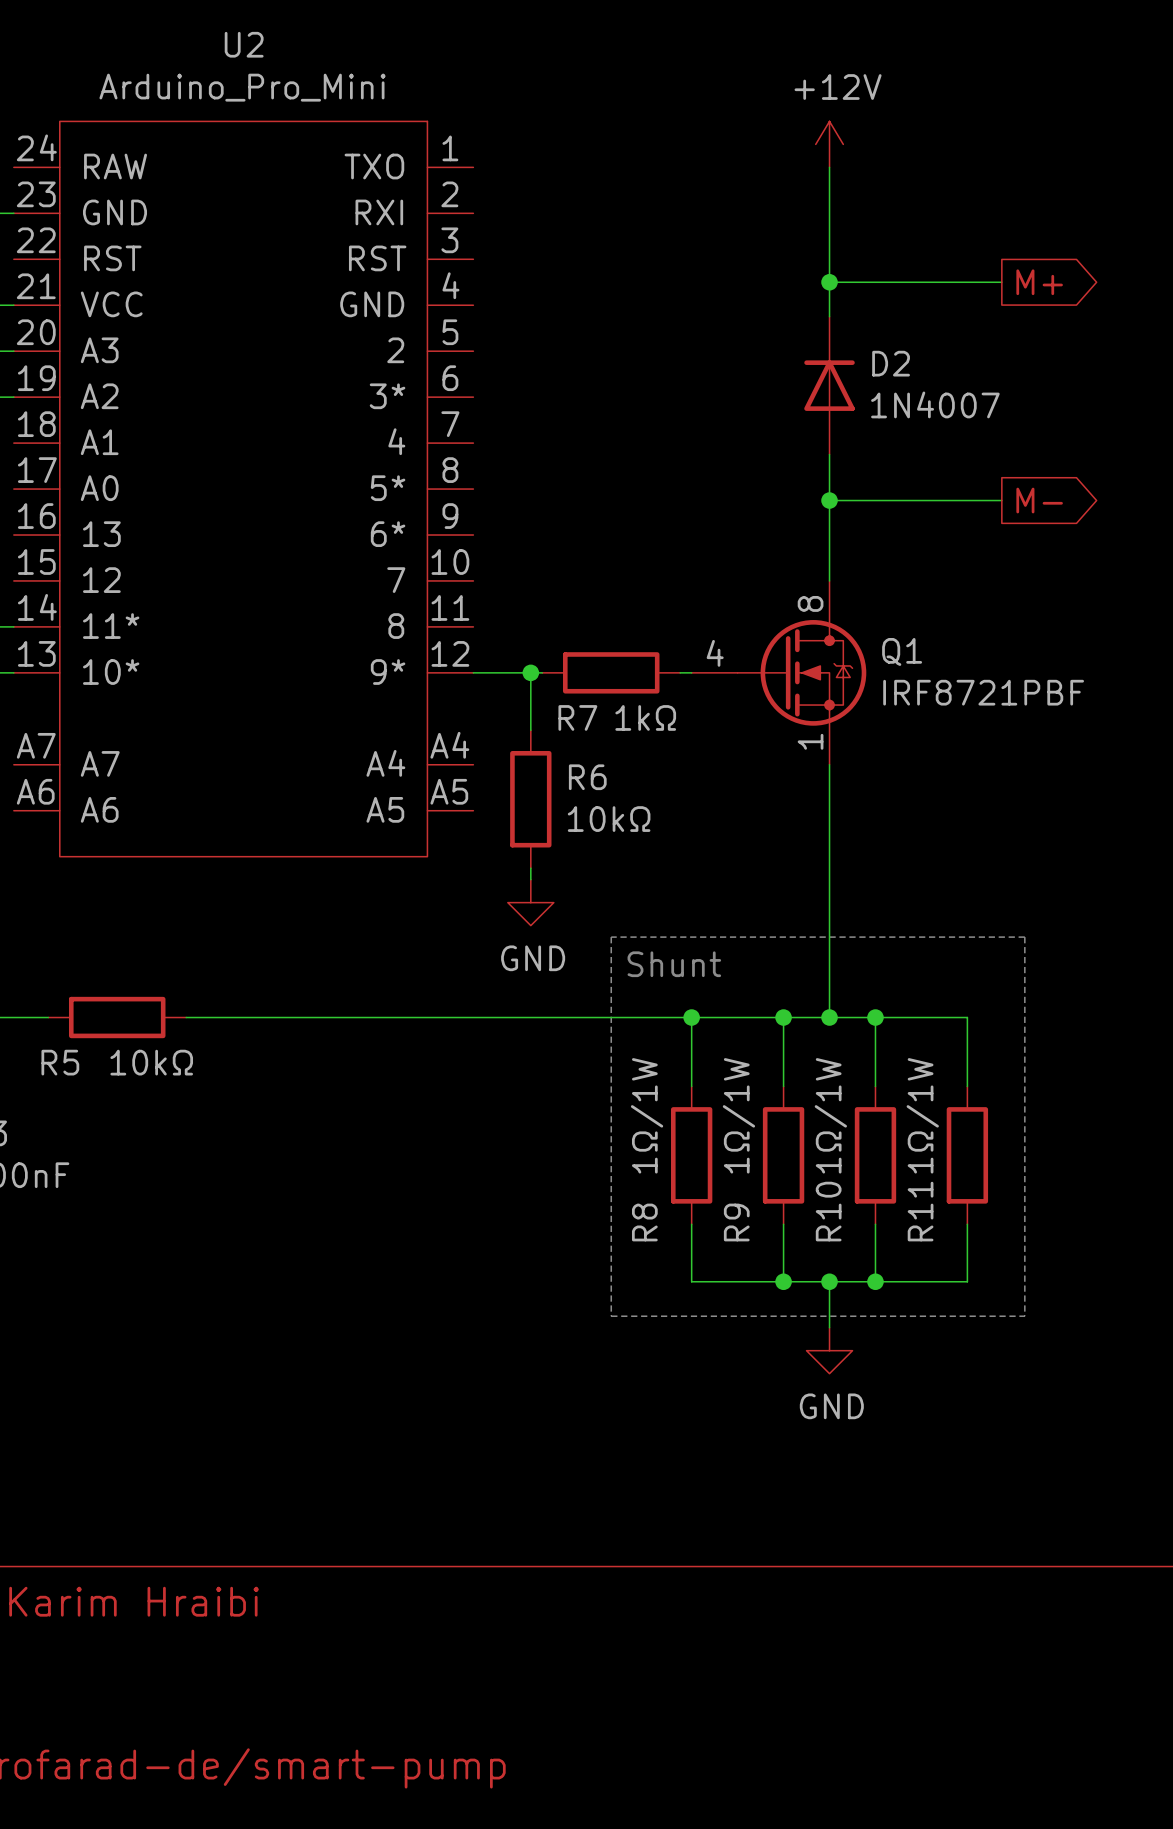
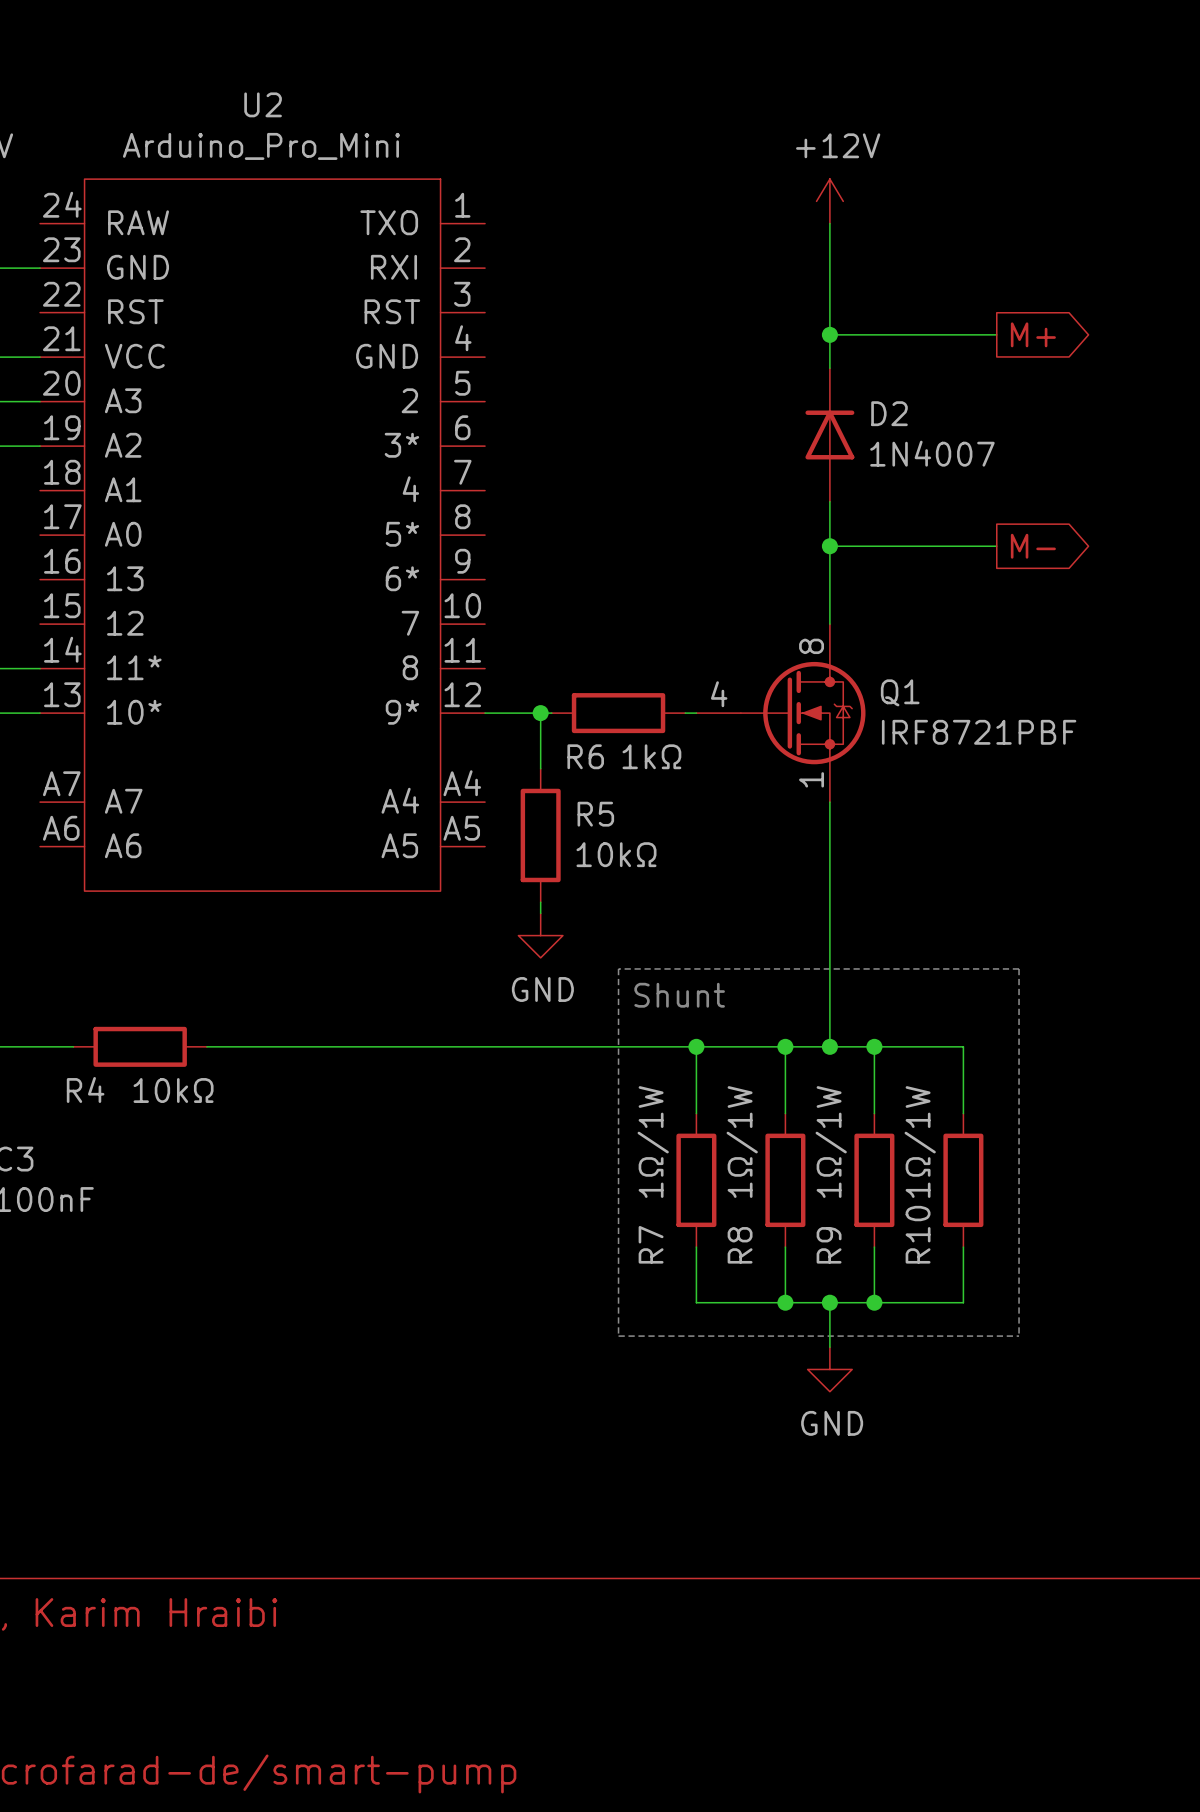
R7 name: R7 (577, 717) -> R6 (585, 756)
R6 name: R6 (587, 777) -> R5 (595, 814)
R5 name: R5 (60, 1062) -> R4 (85, 1089)
R10 name: R10 (828, 1211) -> R9 (829, 1245)
R11 name: R11 (920, 1211) -> R10 (918, 1234)
R8 name: R8 (644, 1222) -> R7 (651, 1244)
R9 name: R9 (736, 1222) -> R8 (740, 1245)

